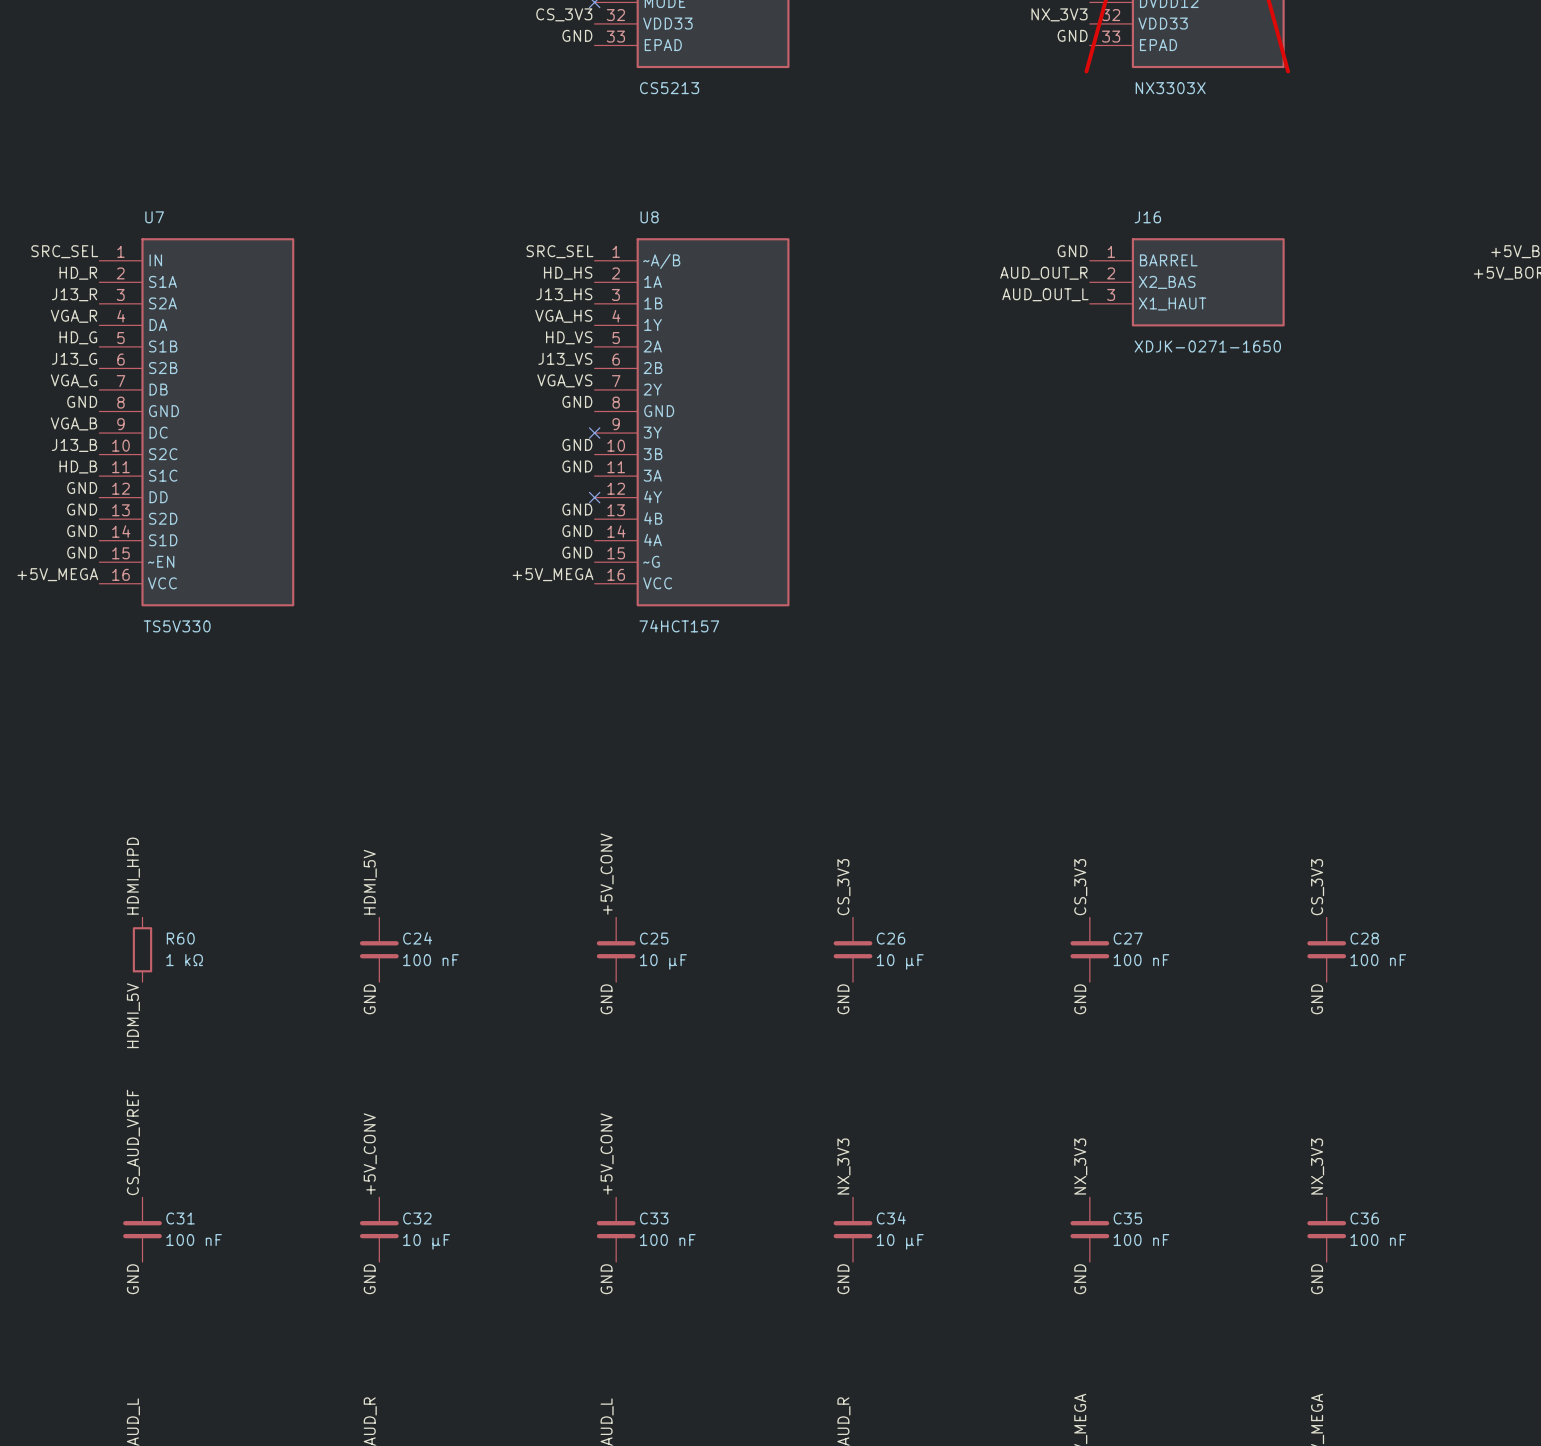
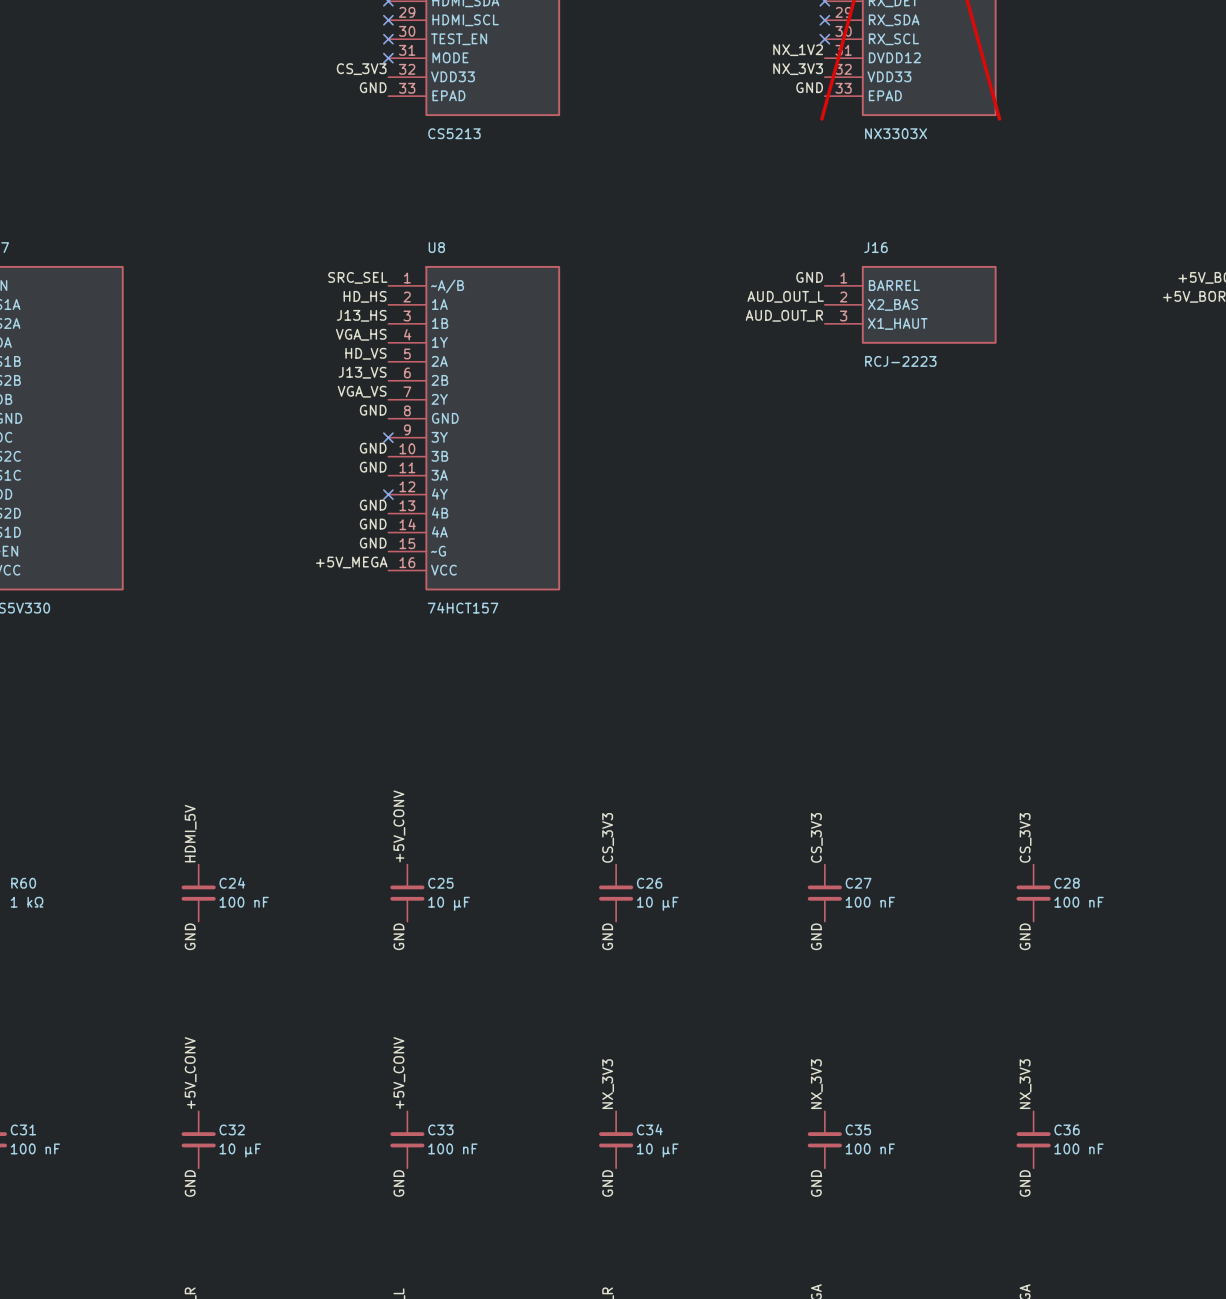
label: AUD_OUT_R (1043, 273) -> AUD_OUT_L (785, 296)
label: AUD_OUT_L (1045, 294) -> AUD_OUT_R (784, 315)
J16 value: XDJK-0271-1650 (1207, 346) -> RCJ-2223 (900, 361)

